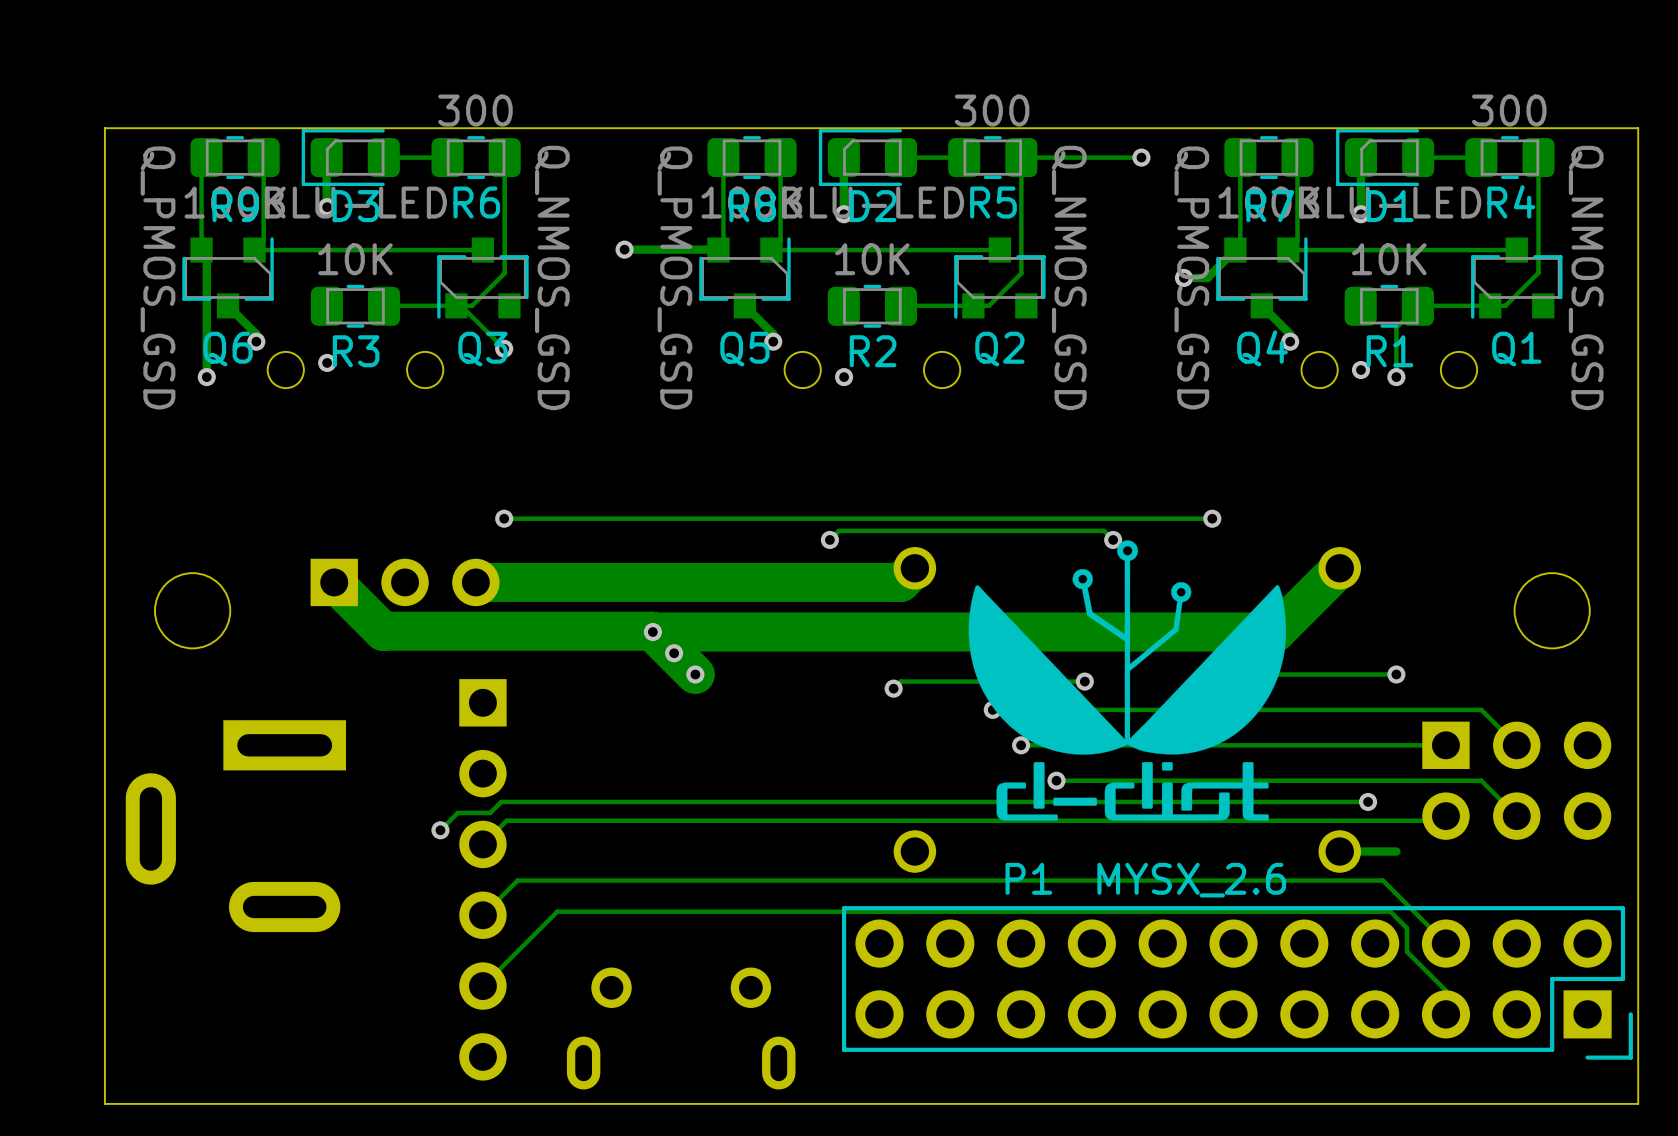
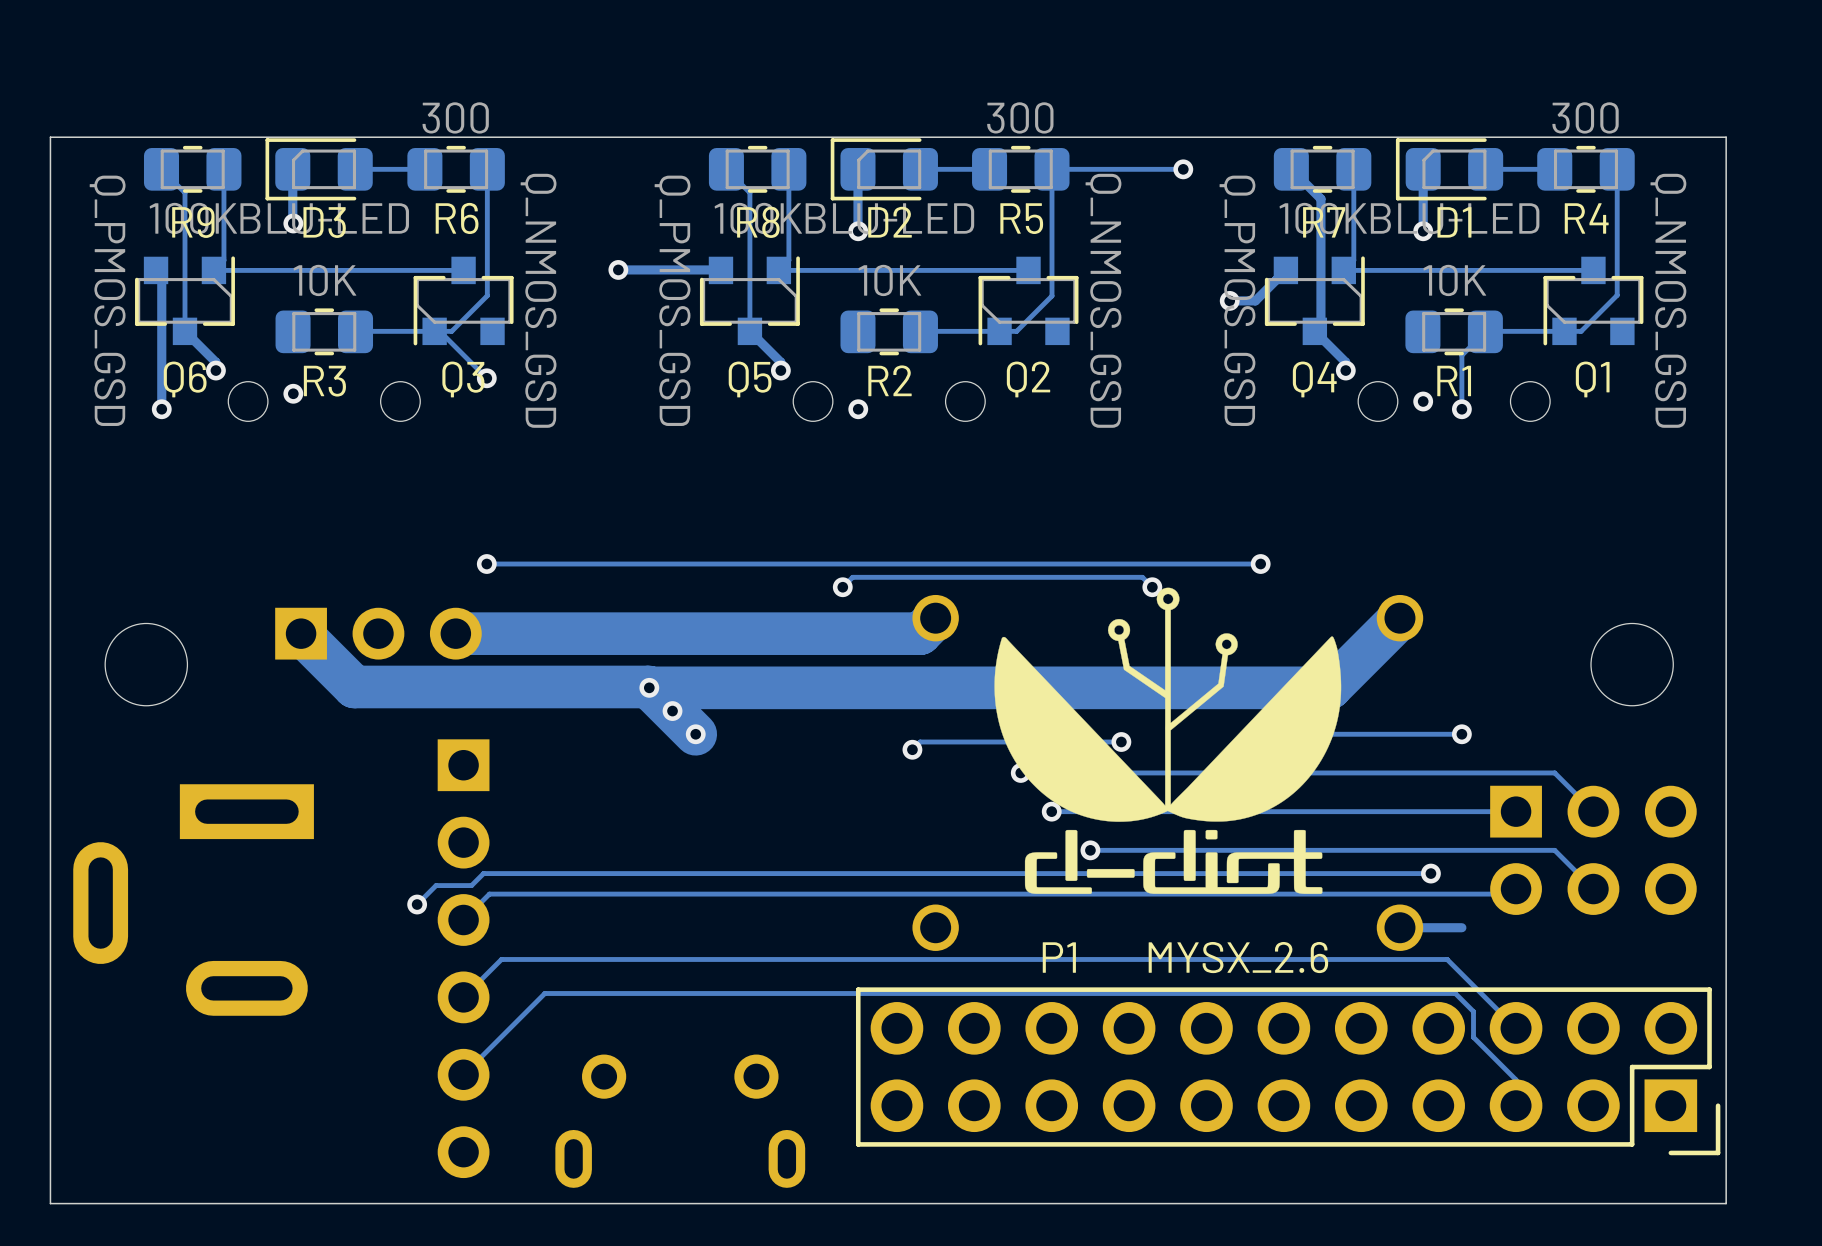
track: (206, 157) (201, 162) (201, 250) -> (161, 169) (184, 192) (184, 331)
track: (723, 157) (723, 245) (718, 250) -> (726, 169) (749, 192) (749, 331)
track: (1240, 157) (1240, 245) (1235, 250) -> (1291, 169) (1320, 198) (1320, 325)

